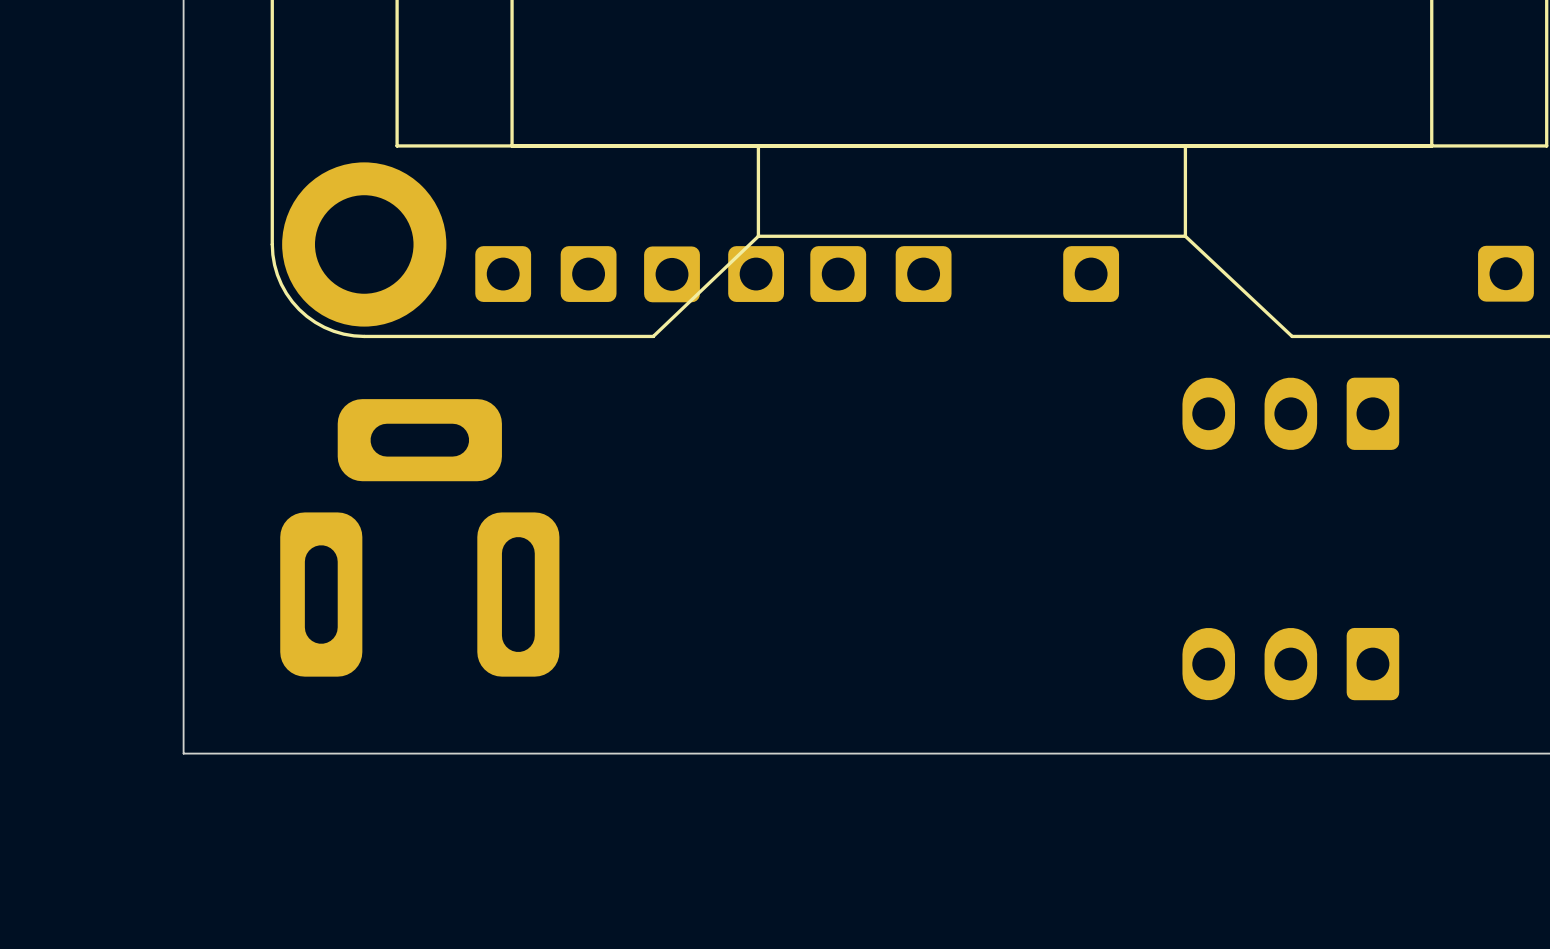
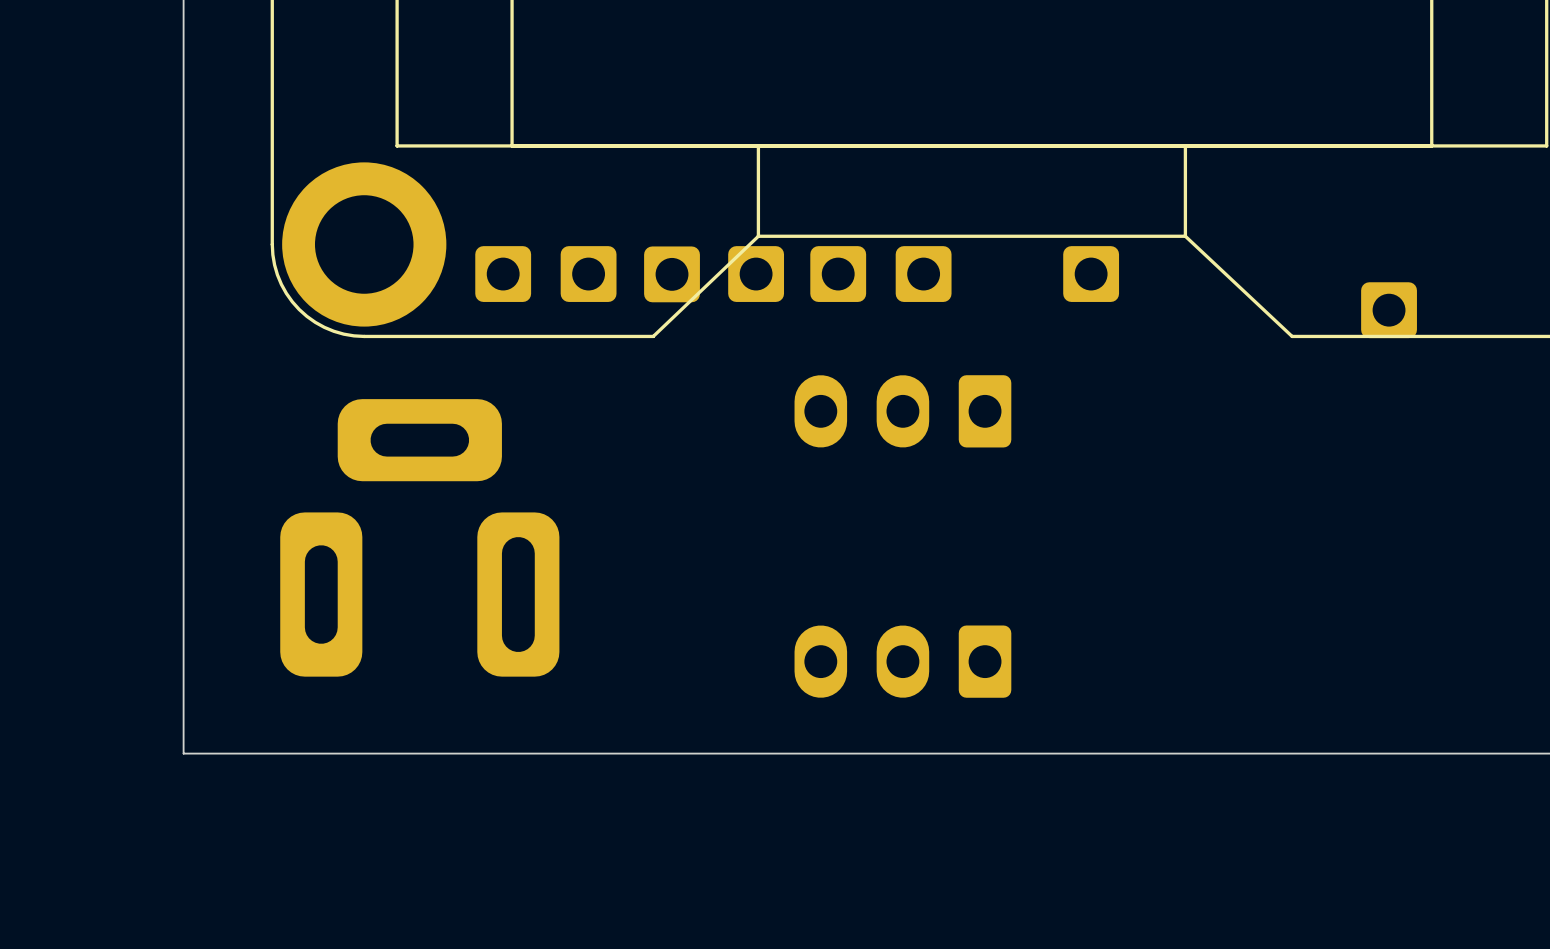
part position: (1505, 273) -> (1389, 310)
part: none -> (902, 411)
part: (1290, 413) -> none
part: none -> (902, 661)
part: (1290, 664) -> none

